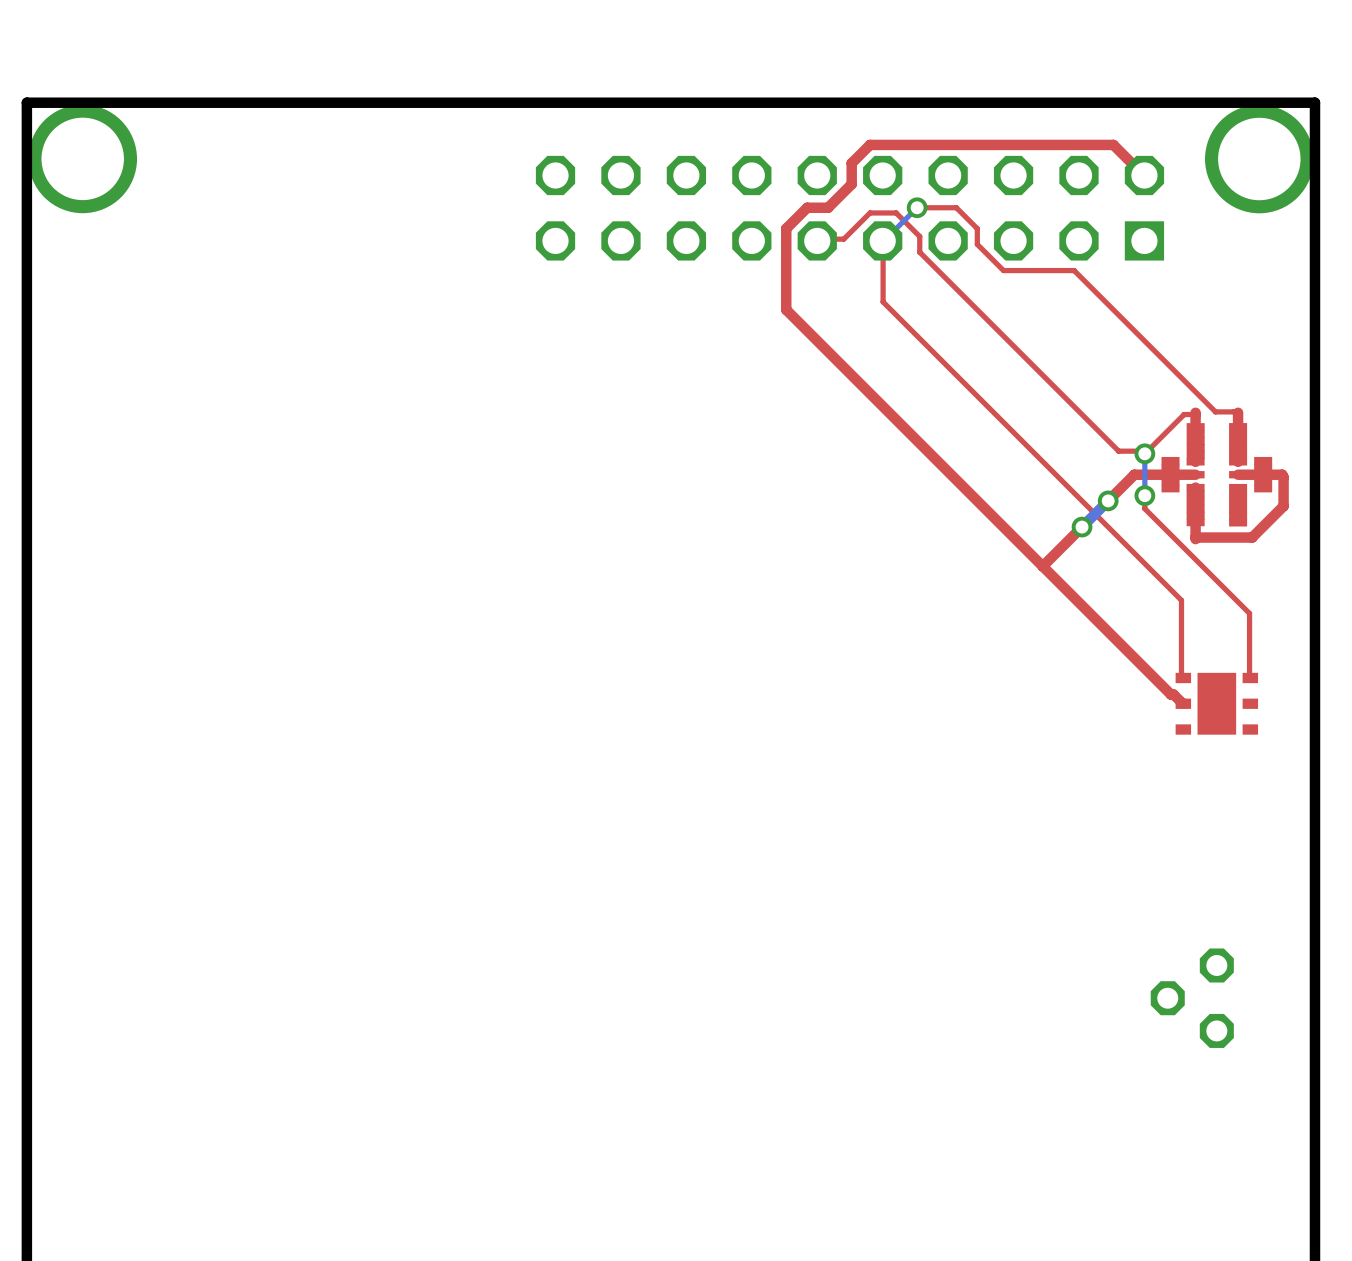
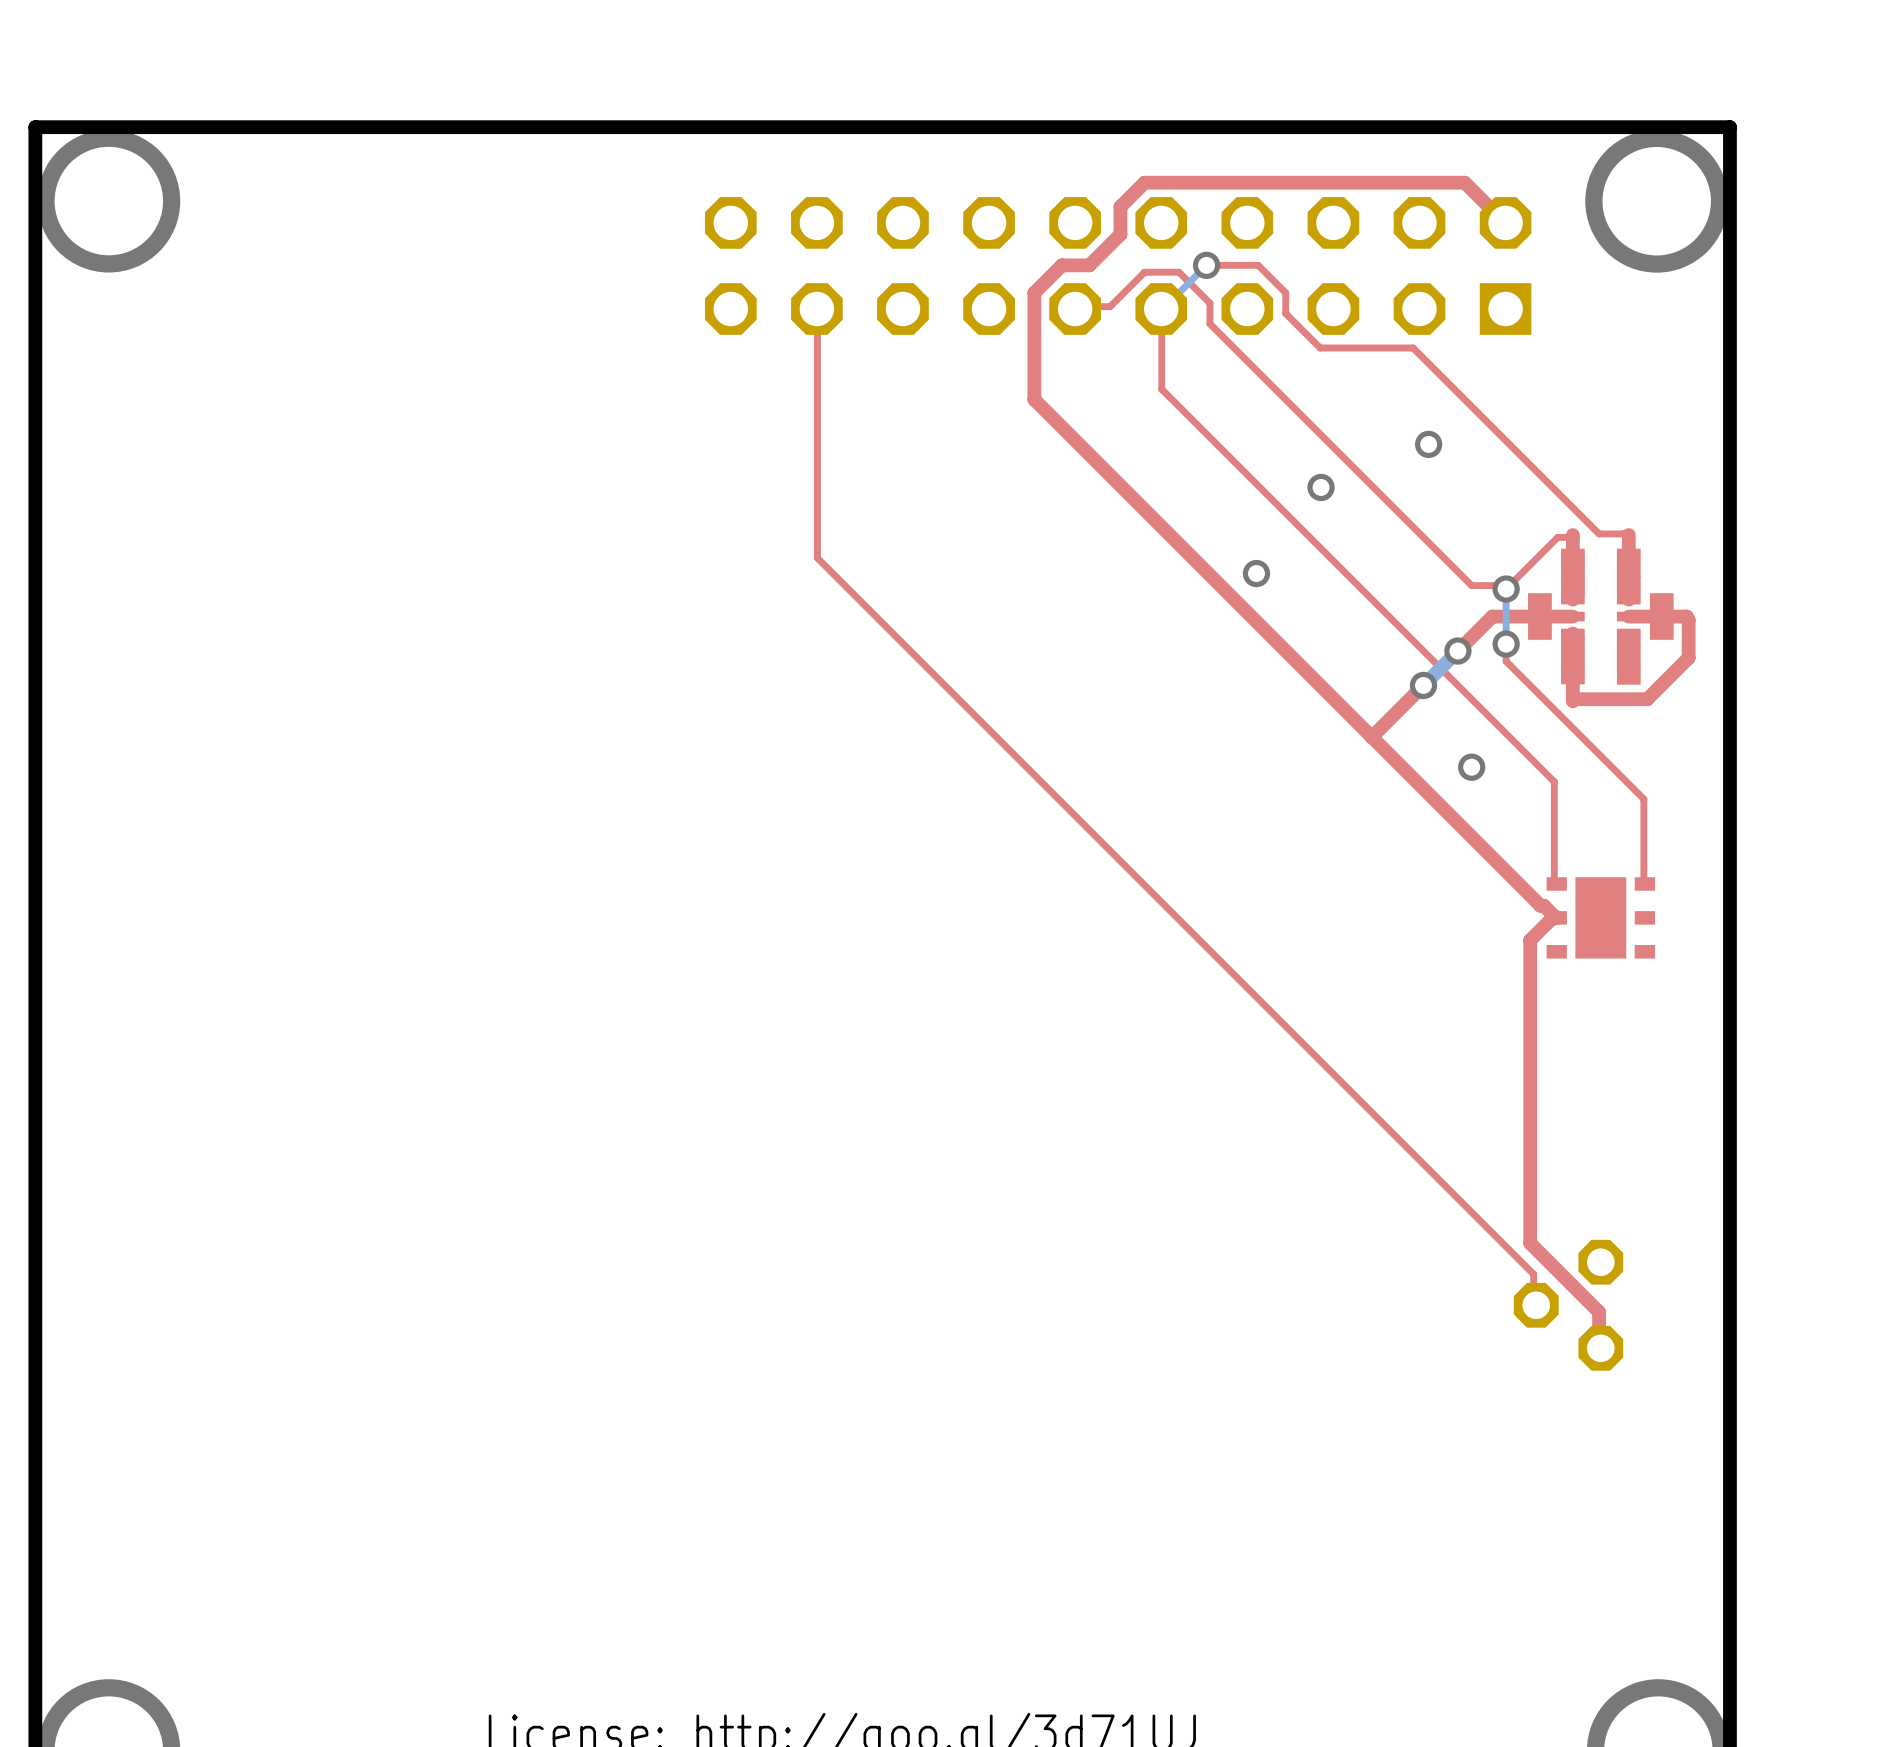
top track: none -> (816, 309) (817, 558) (1533, 1274) (1533, 1305) (1536, 1305)
via: none -> (1428, 444)
via: none -> (1321, 487)
via: none -> (1256, 573)
via: none -> (1471, 767)
top track: none -> (1556, 917) (1550, 919) (1530, 940) (1530, 1243) (1599, 1312) (1599, 1346) (1600, 1348)

